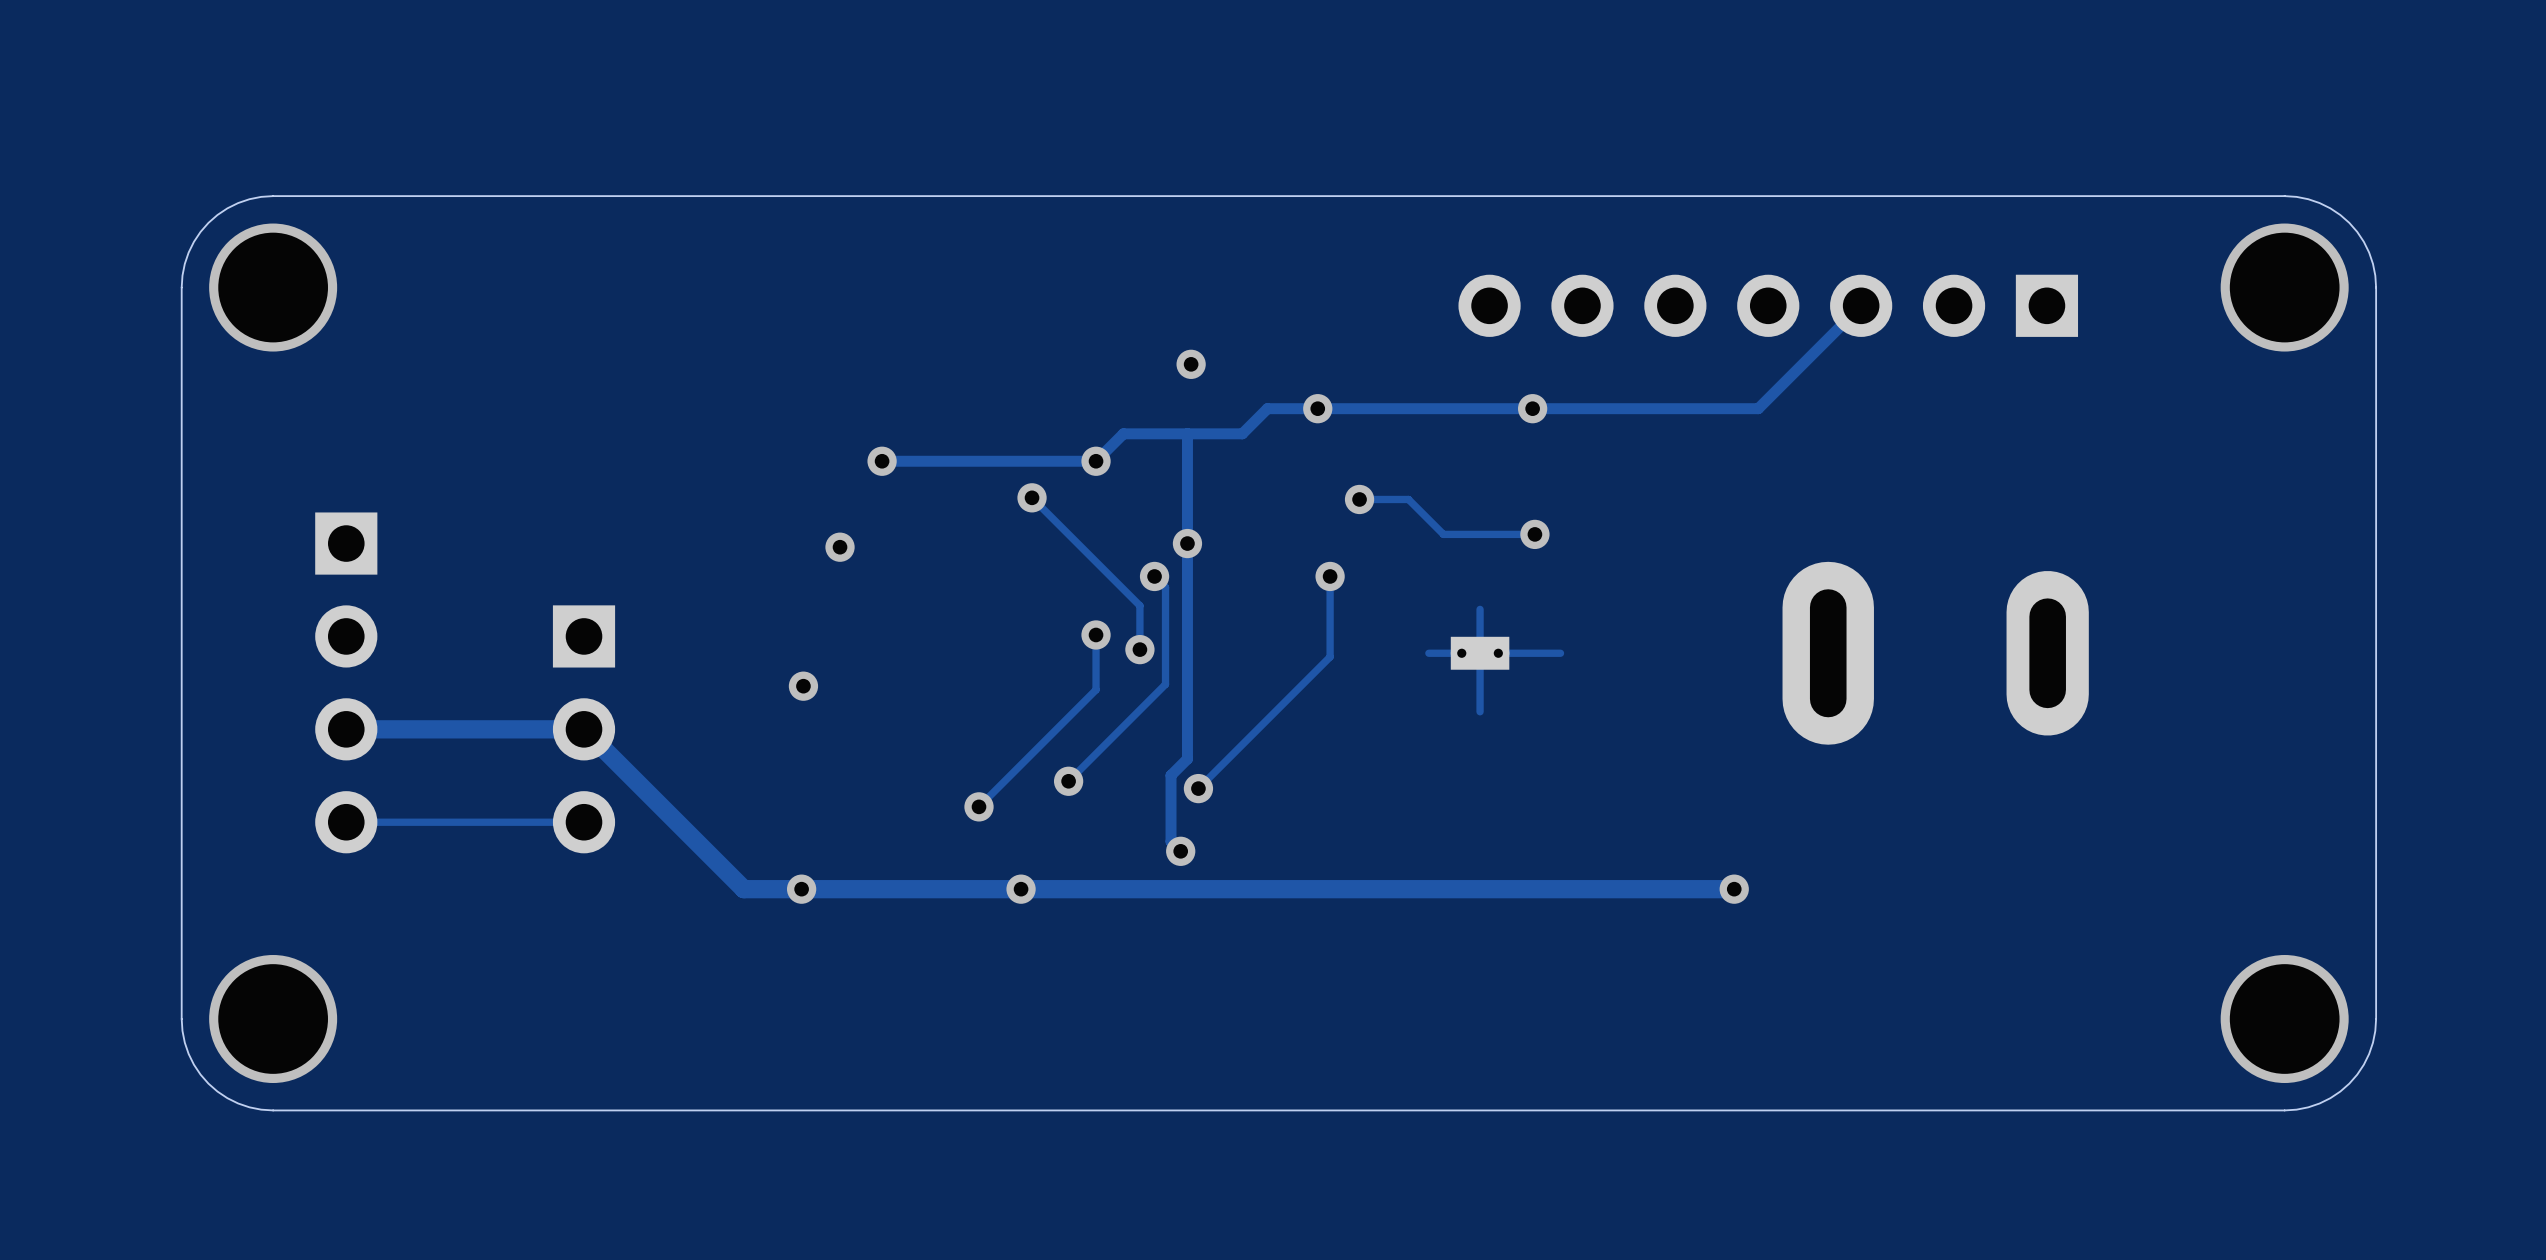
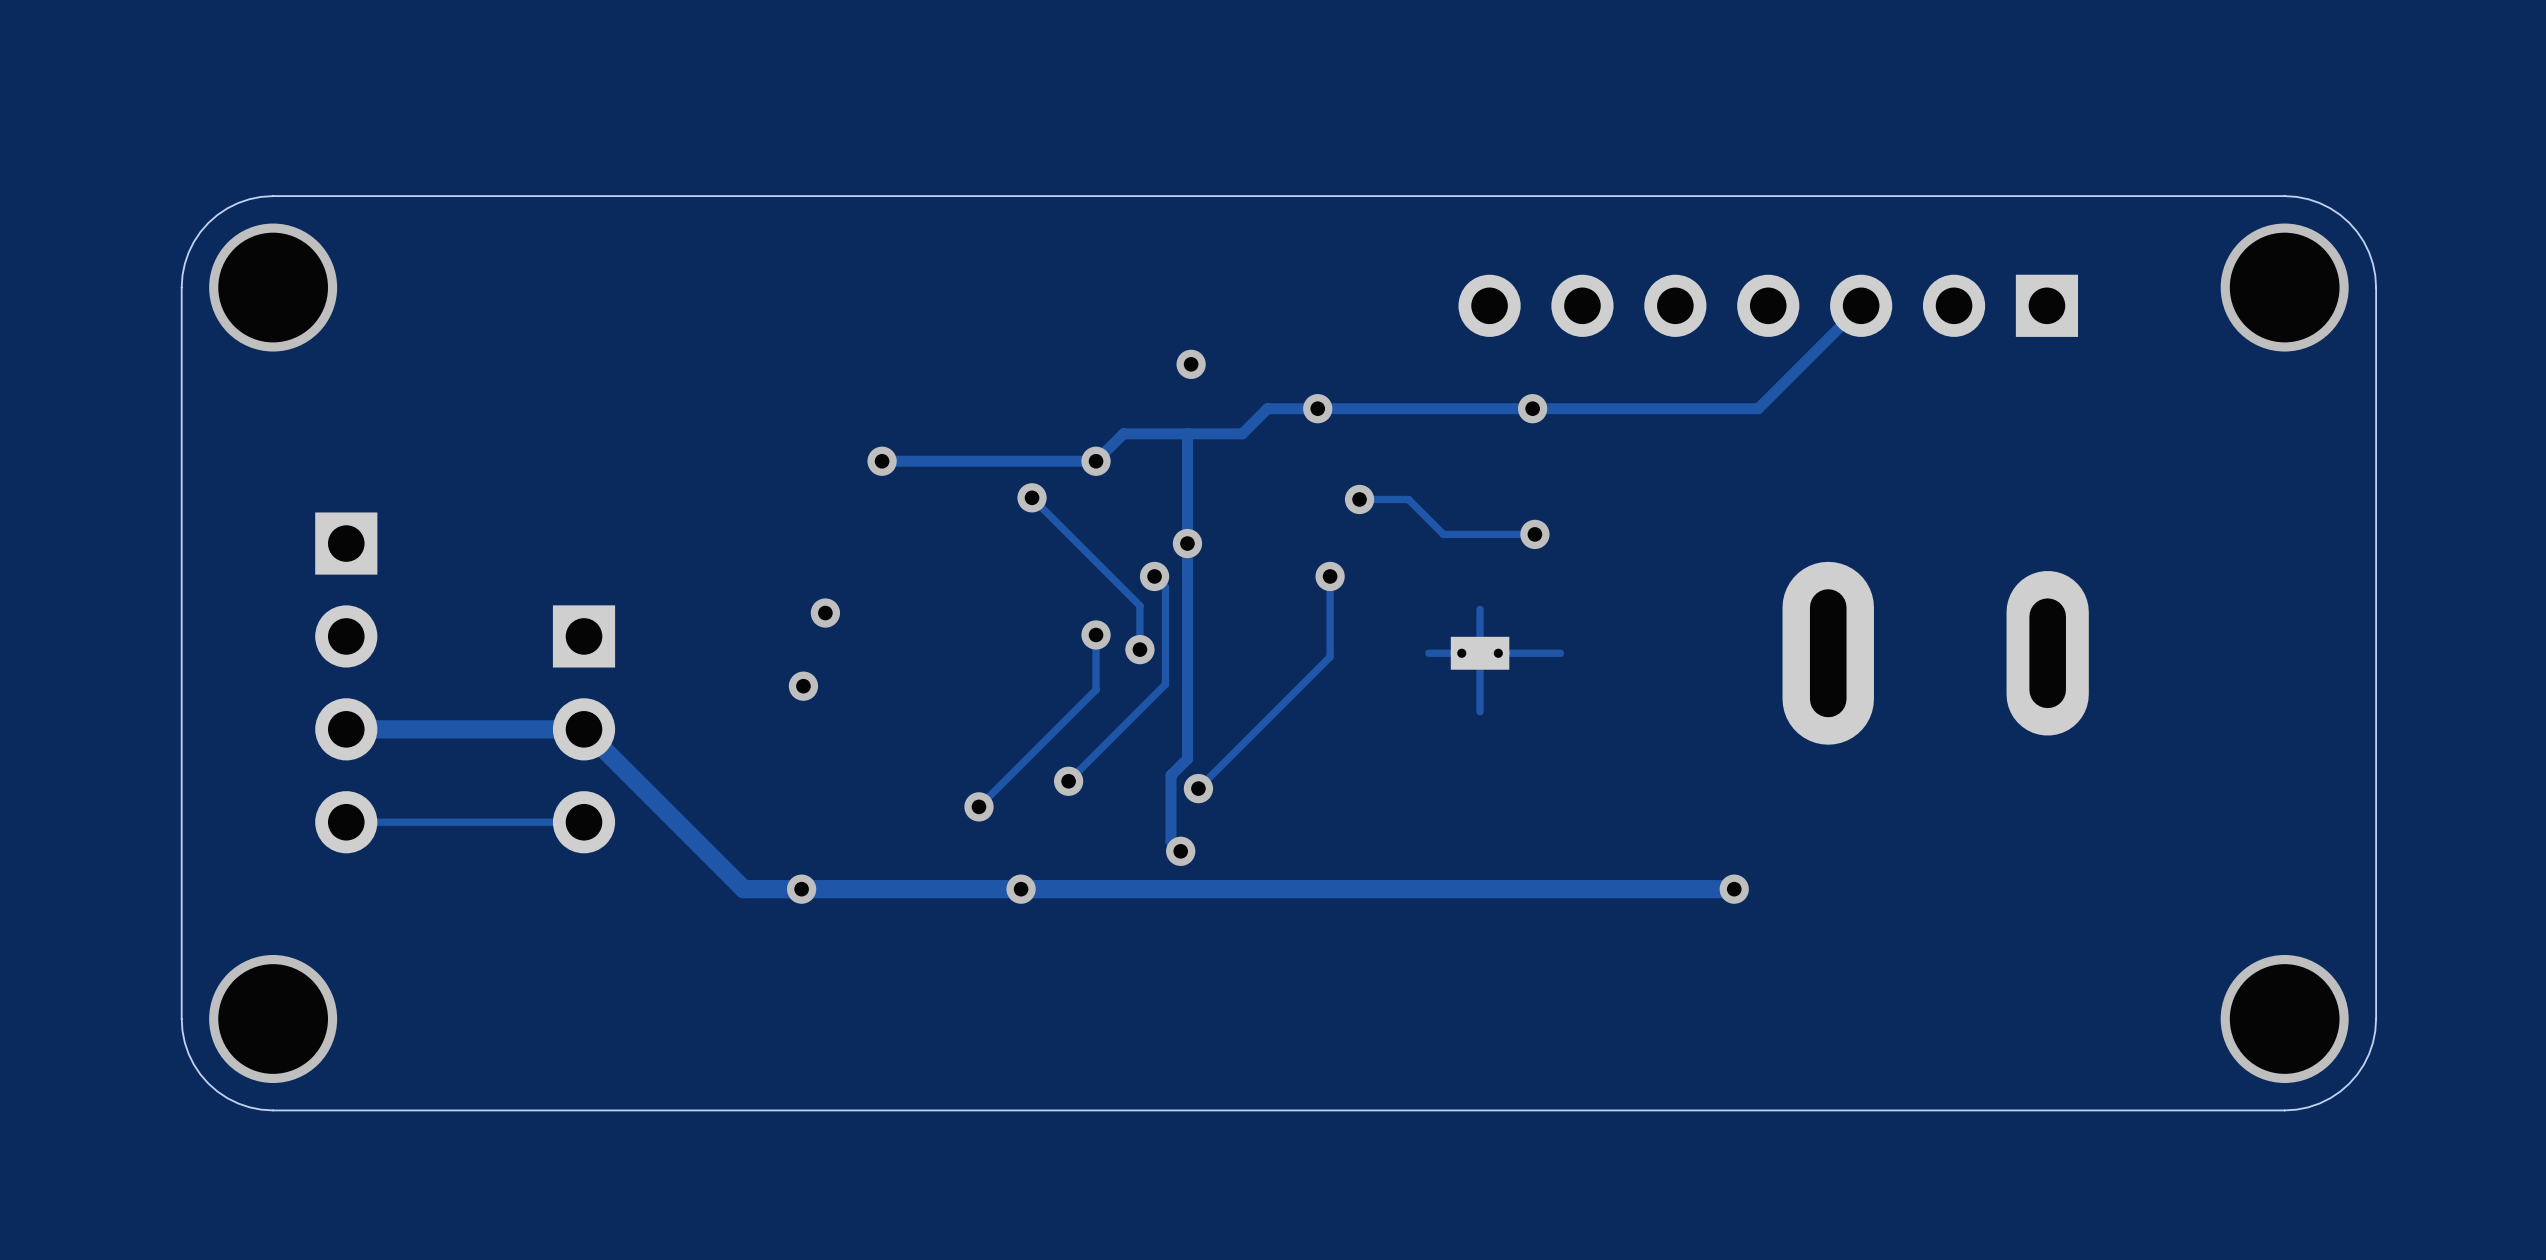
via position: (840, 547) -> (825, 613)

